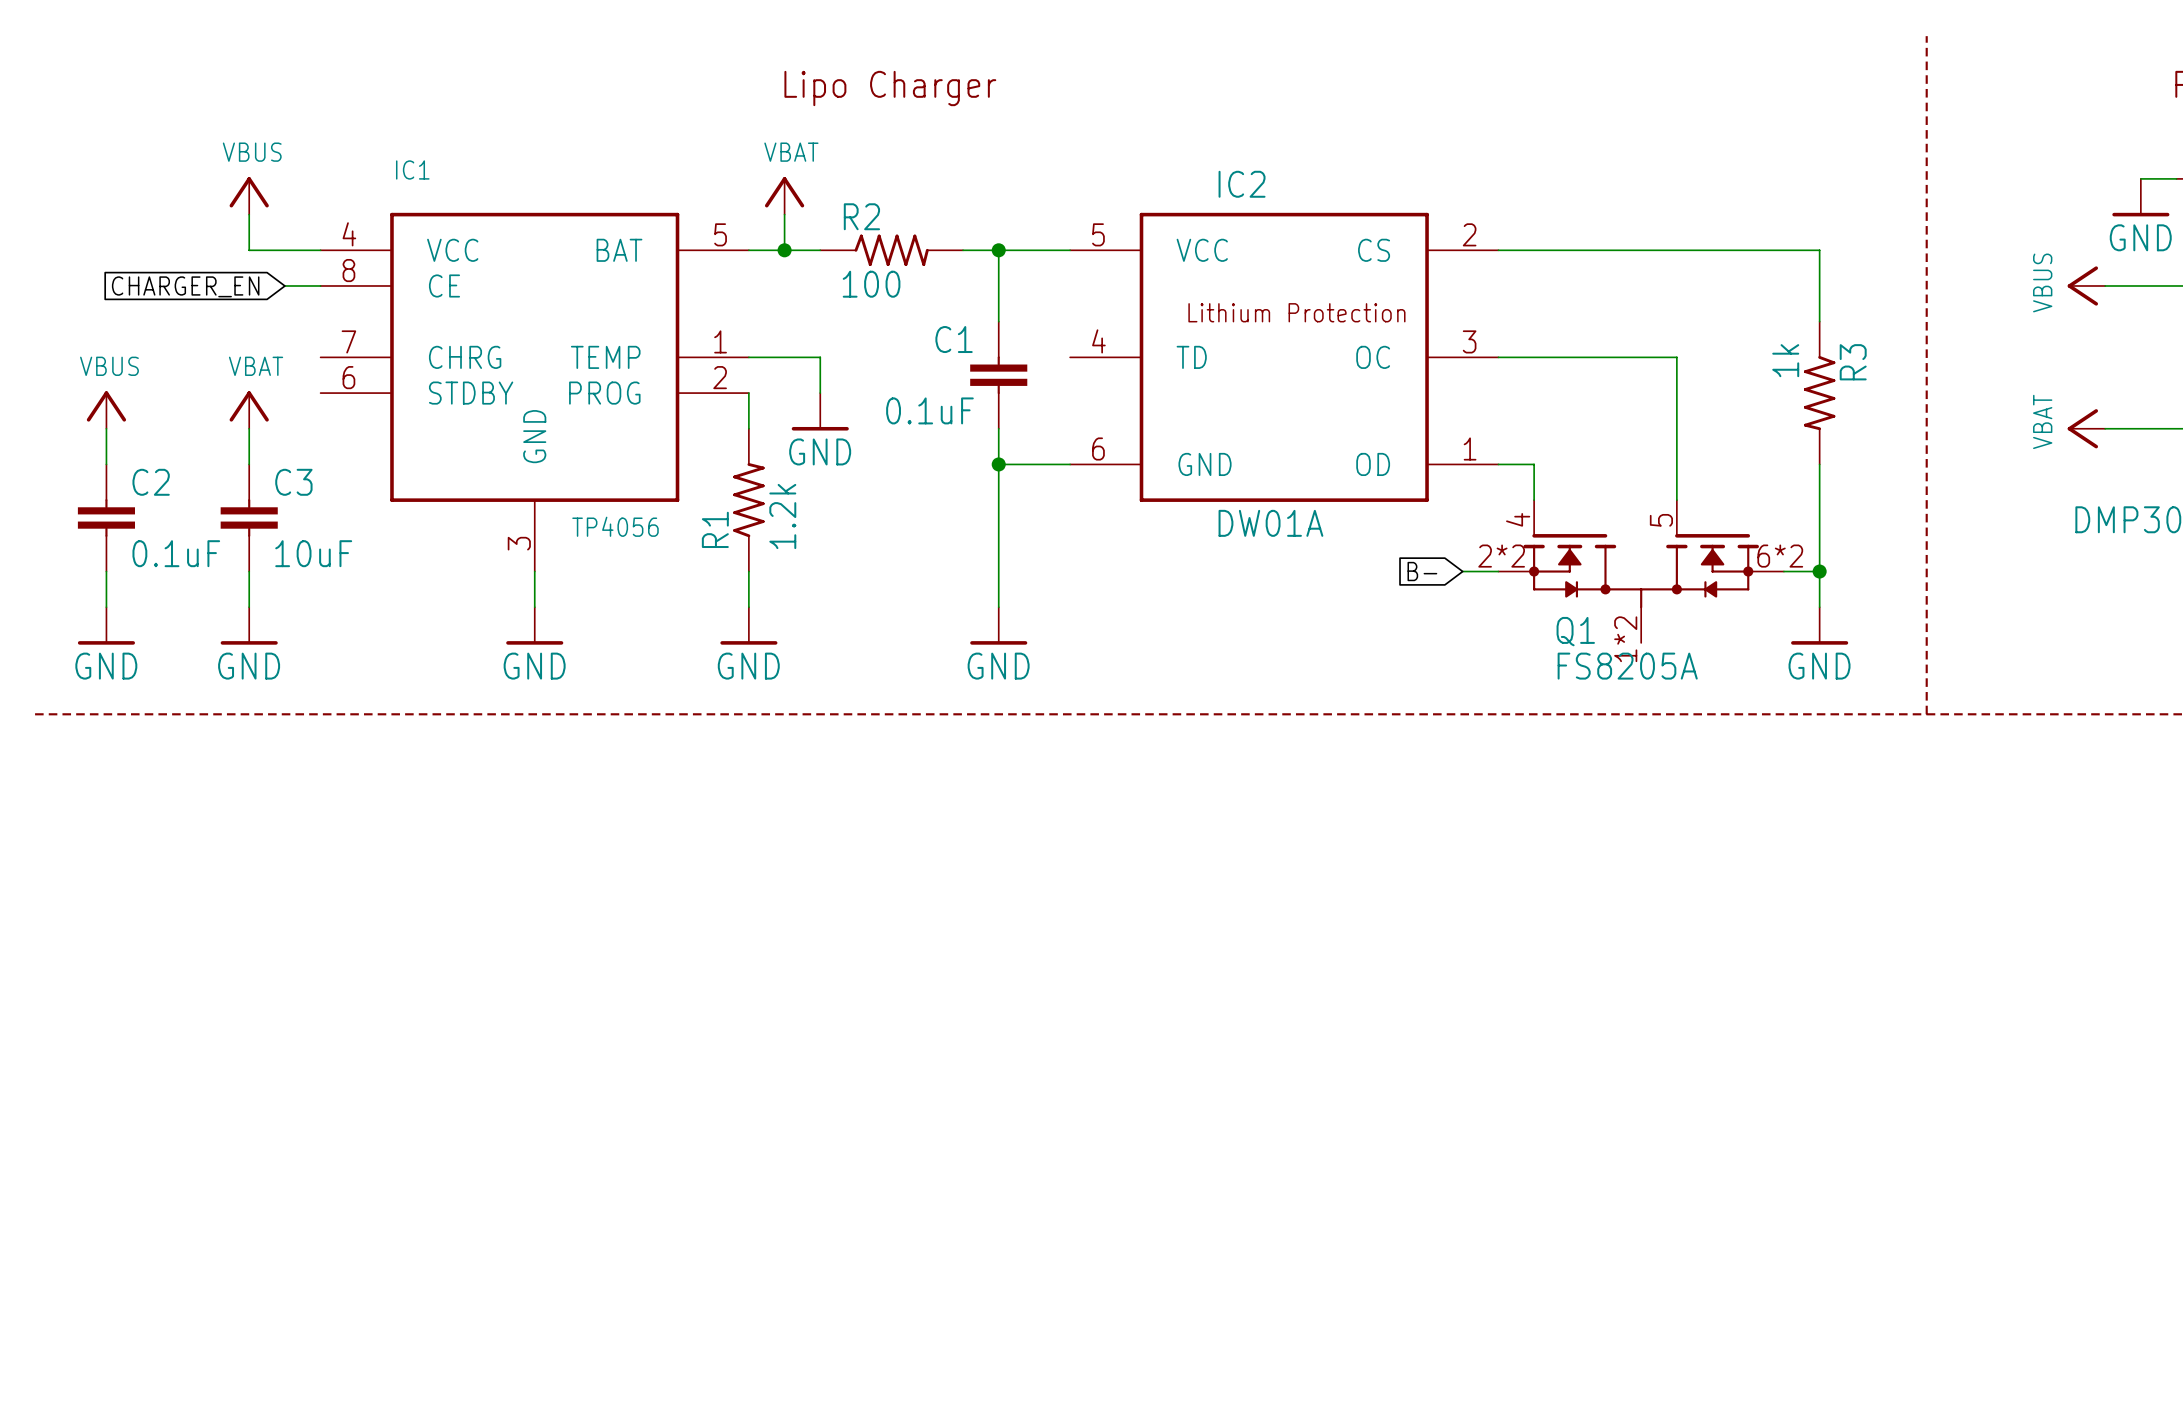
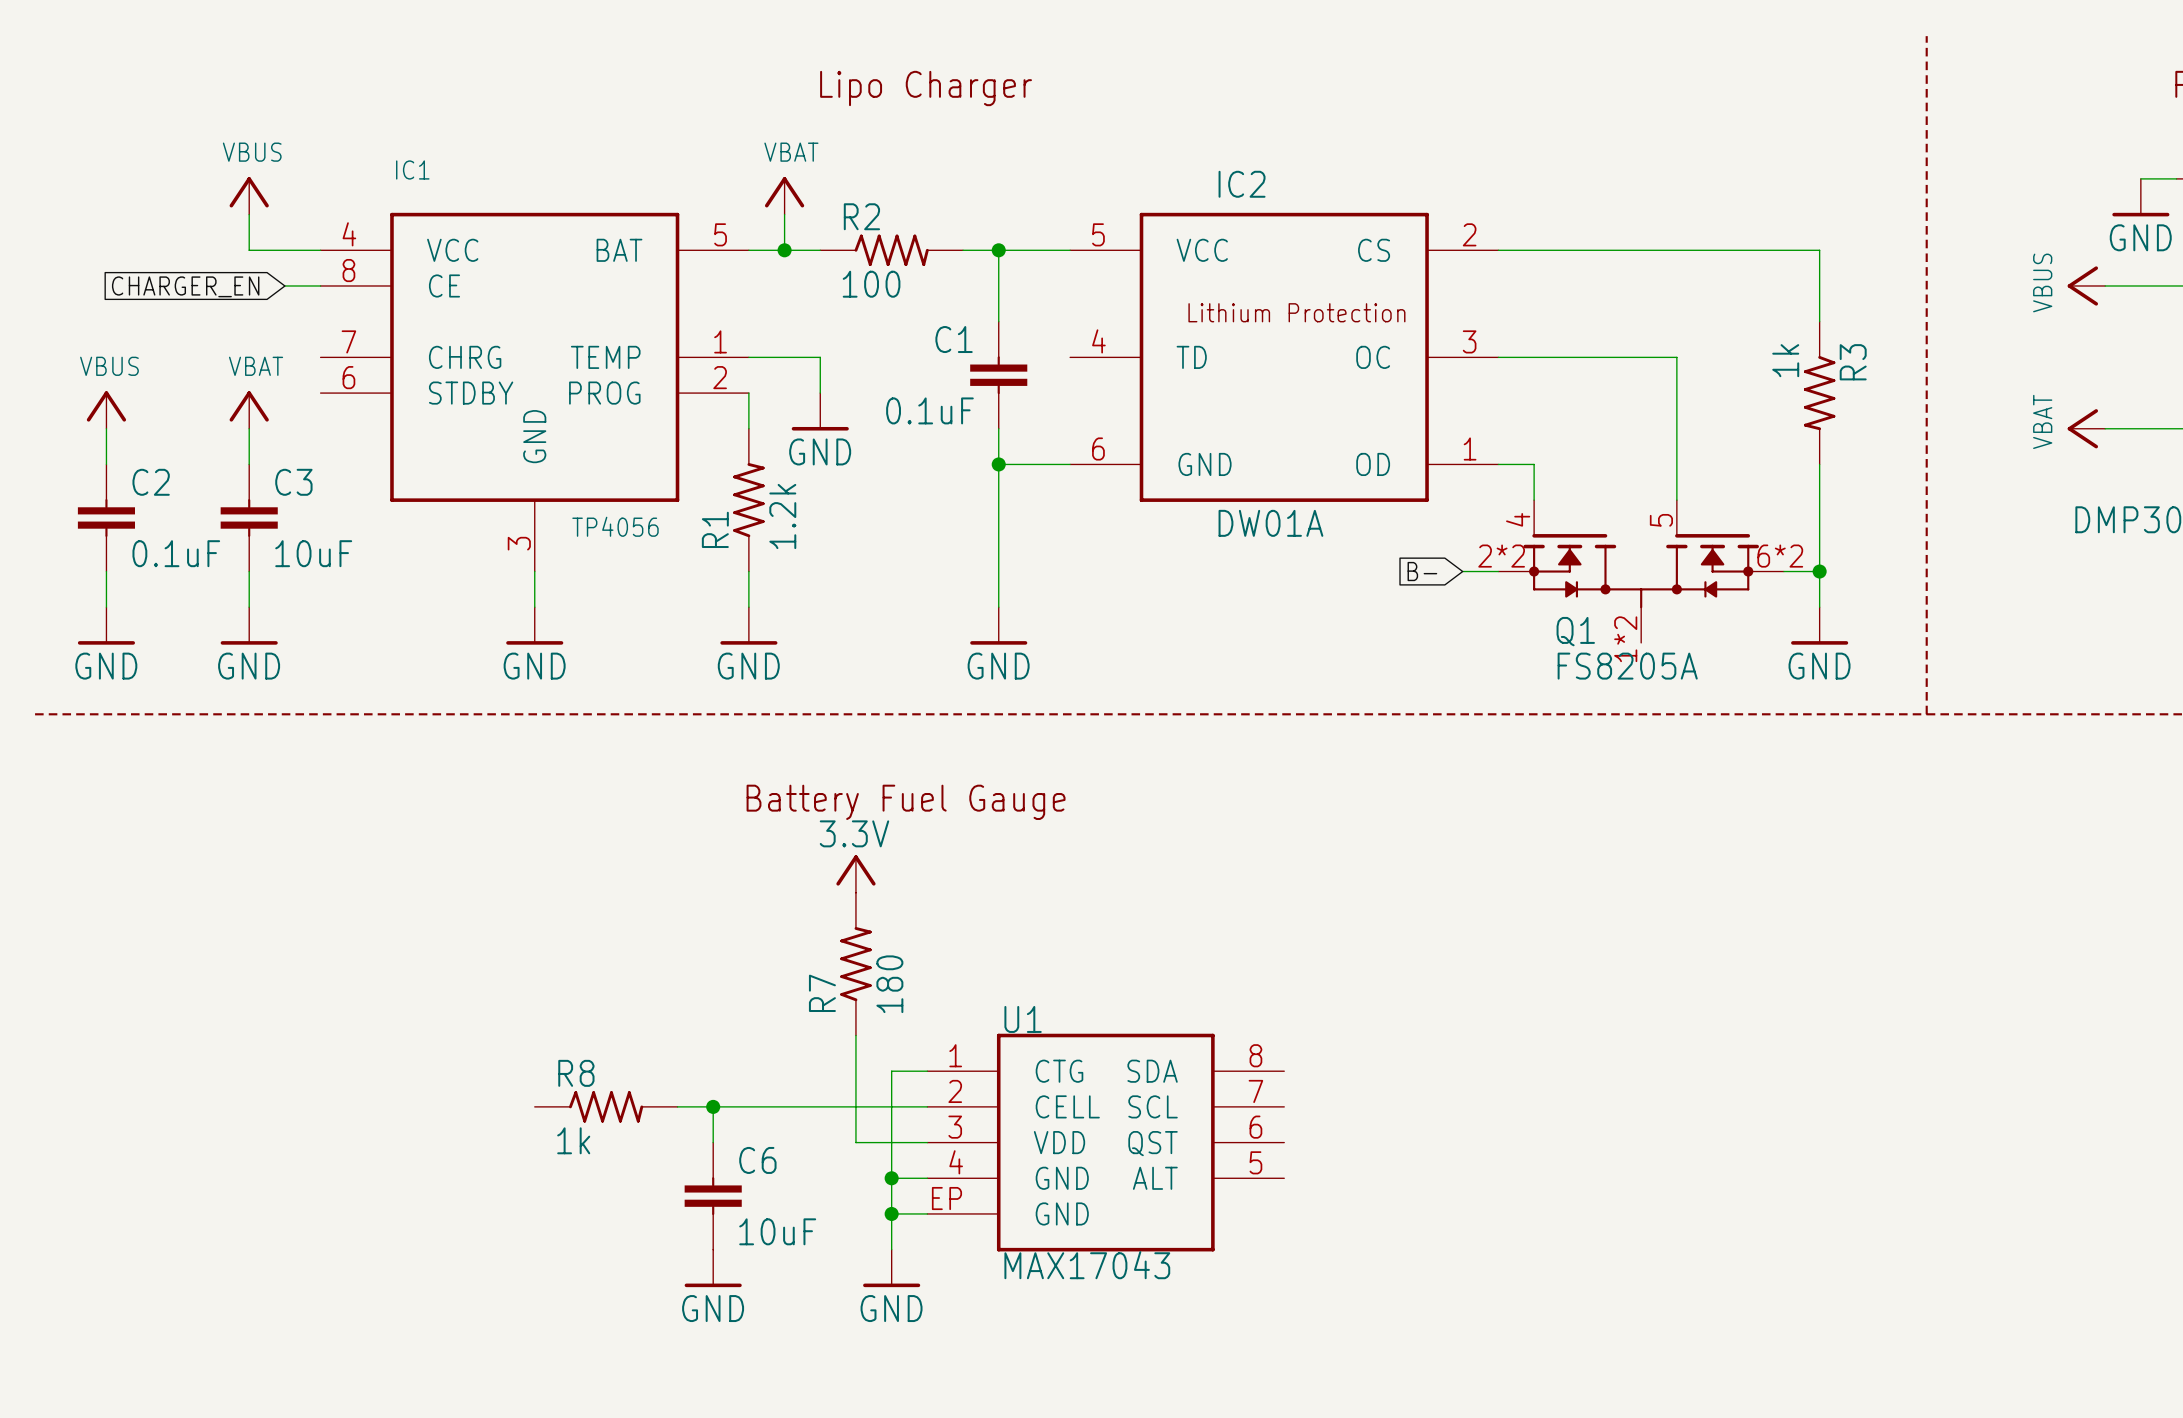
text position: Lipo Charger (890, 88) -> Lipo Charger (926, 88)
text: none -> Battery Fuel Gauge (906, 802)
power symbol: none -> 3.3V (855, 874)
R7: none -> 180 (855, 964)
wire: none -> (855, 1035) (855, 1142) (927, 1142)
wire: none -> (927, 1071) (891, 1071) (891, 1249)
R8: none -> 1k (606, 1106)
wire: none -> (677, 1106) (927, 1106)
wire: none -> (713, 1106) (713, 1142)
junction: none -> (713, 1106)
U1: none -> MAX17043 (1105, 1142)
wire: none -> (891, 1178) (927, 1178)
junction: none -> (891, 1178)
C6: none -> 10uF (713, 1196)
wire: none -> (891, 1213) (927, 1213)
junction: none -> (891, 1213)
power symbol: none -> GND (713, 1268)
power symbol: none -> GND (891, 1268)

